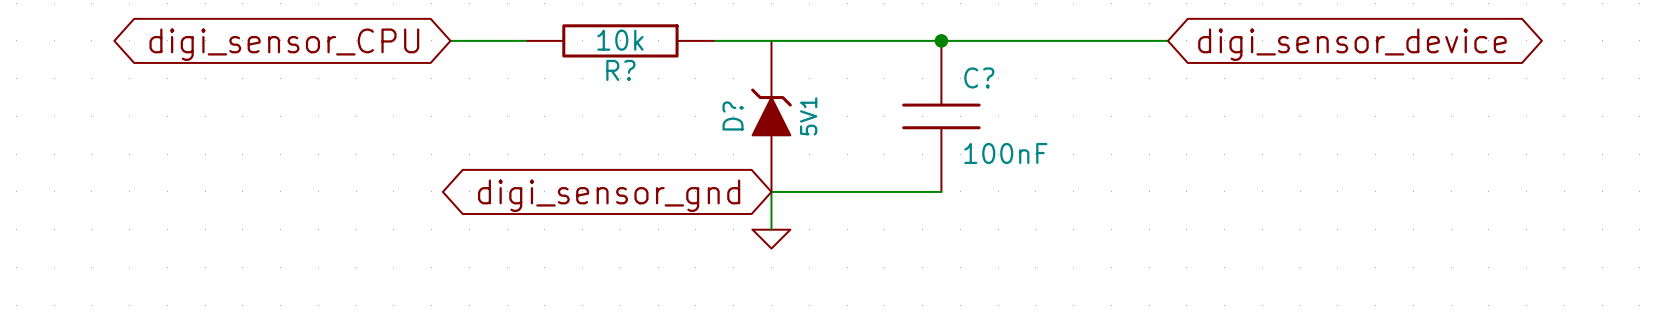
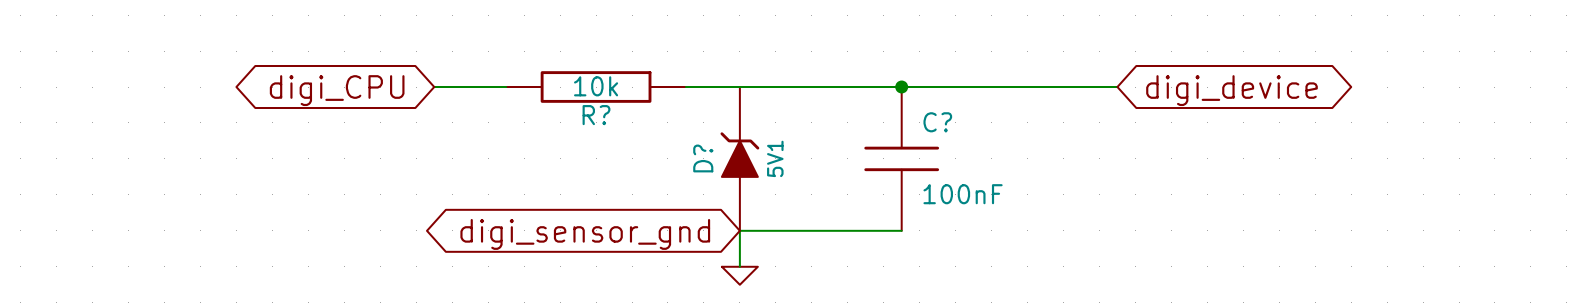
global label: digi_sensor_CPU (284, 44) -> digi_CPU (337, 90)
global label: digi_sensor_device (1352, 44) -> digi_device (1231, 90)

